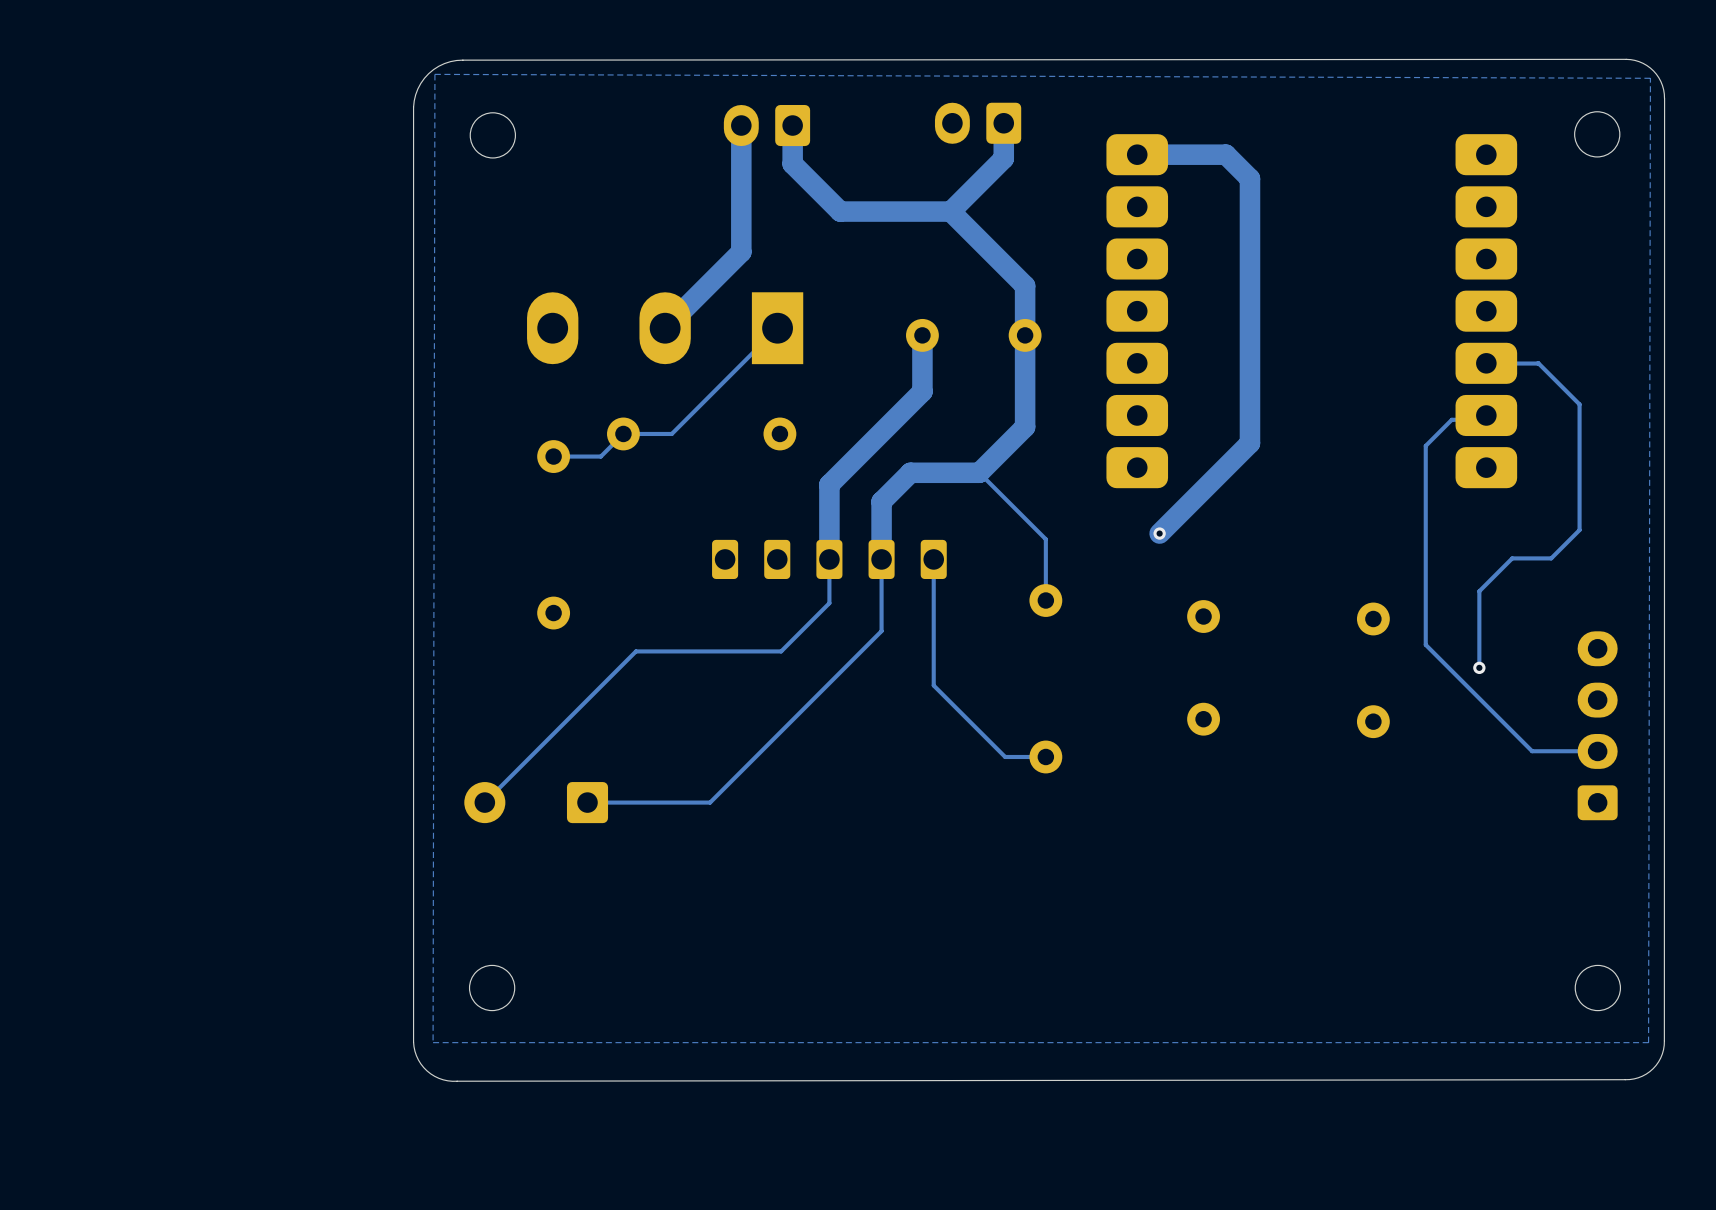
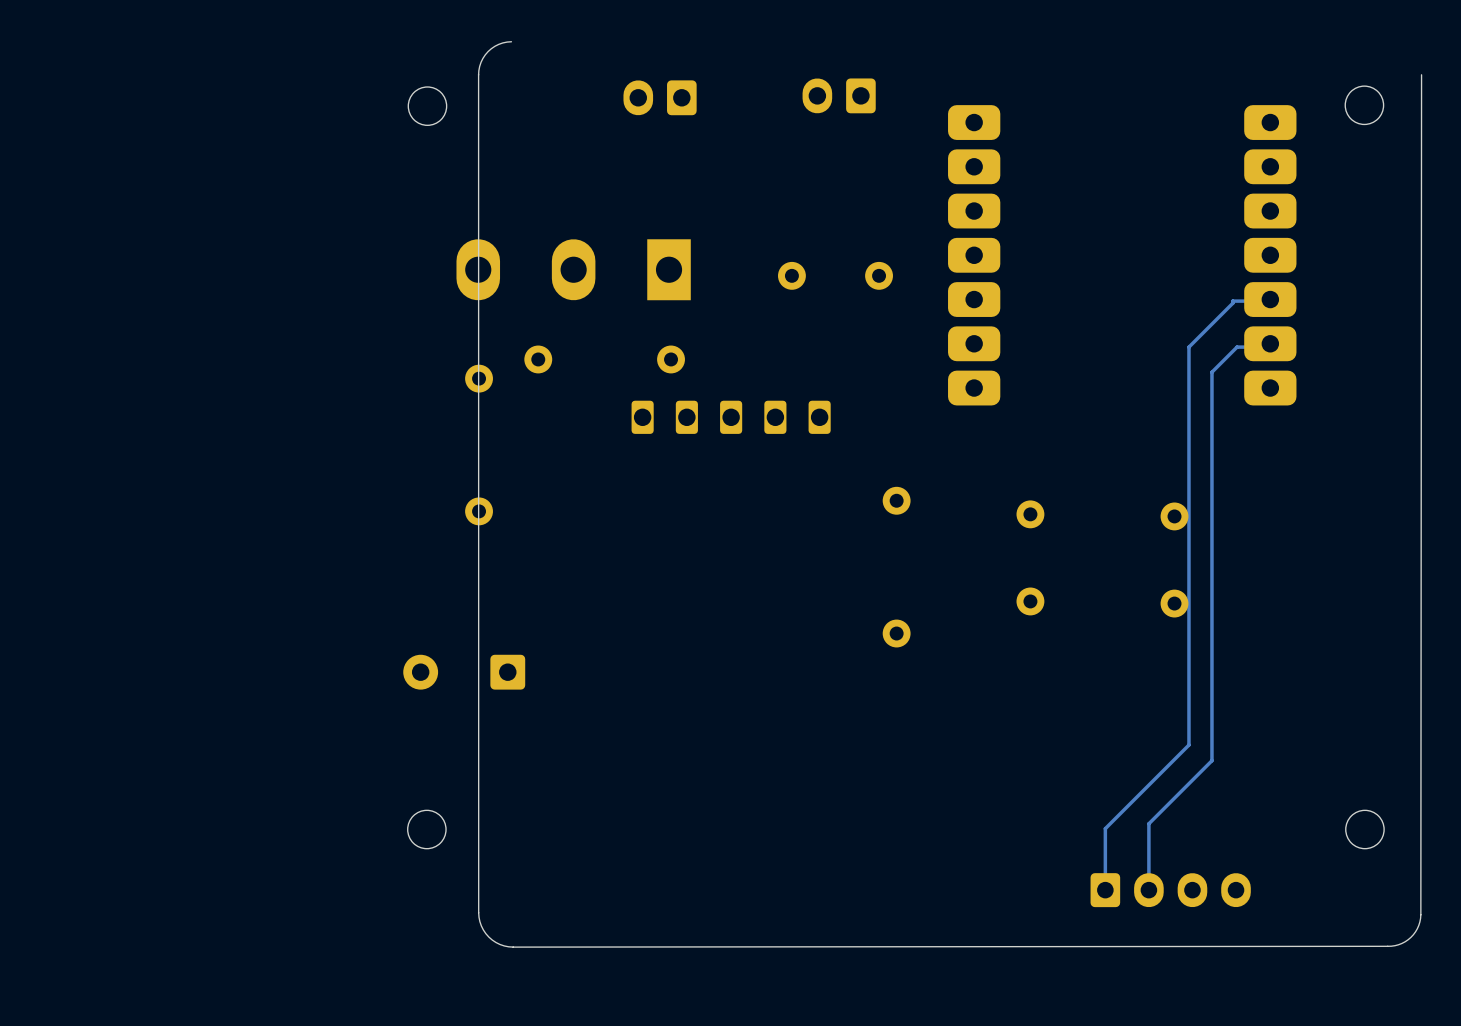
board edge: none -> (511, 41) (498, 44) (488, 51) (481, 62) (478, 74)
zone outline: (434, 74) (1650, 78) (1648, 1042) (433, 1042) (434, 74) -> none
board edge: none -> (478, 74) (478, 912) (481, 925) (488, 937) (500, 944) (513, 947) (1387, 946) (1401, 943) (1410, 937) (1418, 925) (1420, 914) (1421, 74)
board edge: (413, 107) (413, 1042) (418, 1060) (430, 1073) (443, 1079) (452, 1081) (1625, 1079) (1642, 1076) (1656, 1065) (1662, 1053) (1664, 1040) (1664, 98) (1660, 81) (1650, 68) (1639, 61) (1626, 59) (462, 60) (444, 63) (428, 73) (417, 88) (413, 107) -> none
track: (1003, 123) (1003, 158) (950, 211) -> none
track: (741, 125) (741, 252) (665, 328) -> none
track: (792, 125) (792, 163) (840, 211) (950, 211) -> none
track: (1137, 154) (1225, 154) (1249, 178) (1249, 443) (1159, 533) -> none
track: (950, 211) (1025, 285) (1025, 426) (979, 472) -> none
track: (777, 328) (671, 433) (623, 433) (600, 456) (553, 456) -> none
track: (922, 335) (922, 391) (829, 484) (829, 603) (781, 651) (635, 651) (484, 802) -> none
track: (1485, 363) (1538, 363) (1579, 404) (1579, 530) (1551, 558) (1512, 558) (1479, 591) (1479, 667) -> none
track: none -> (1268, 301) (1232, 301) (1188, 347) (1188, 745) (1105, 828) (1105, 890)
track: (1485, 419) (1451, 419) (1425, 445) (1425, 644) (1532, 751) (1597, 751) -> (1269, 347) (1237, 347) (1211, 372) (1211, 760) (1148, 823) (1148, 890)
track: (979, 472) (1045, 539) (1045, 600) -> none
track: (979, 472) (910, 472) (881, 501) (881, 631) (710, 802) (587, 802) -> none
via: (1159, 533) -> none
part position: (829, 559) -> (731, 417)
track: (933, 559) (933, 685) (1005, 756) (1045, 756) -> none
via: (1479, 667) -> none
part rotation: 0° (1597, 725) -> 90° clockwise (1170, 890)
part position: (1597, 725) -> (1170, 890)

